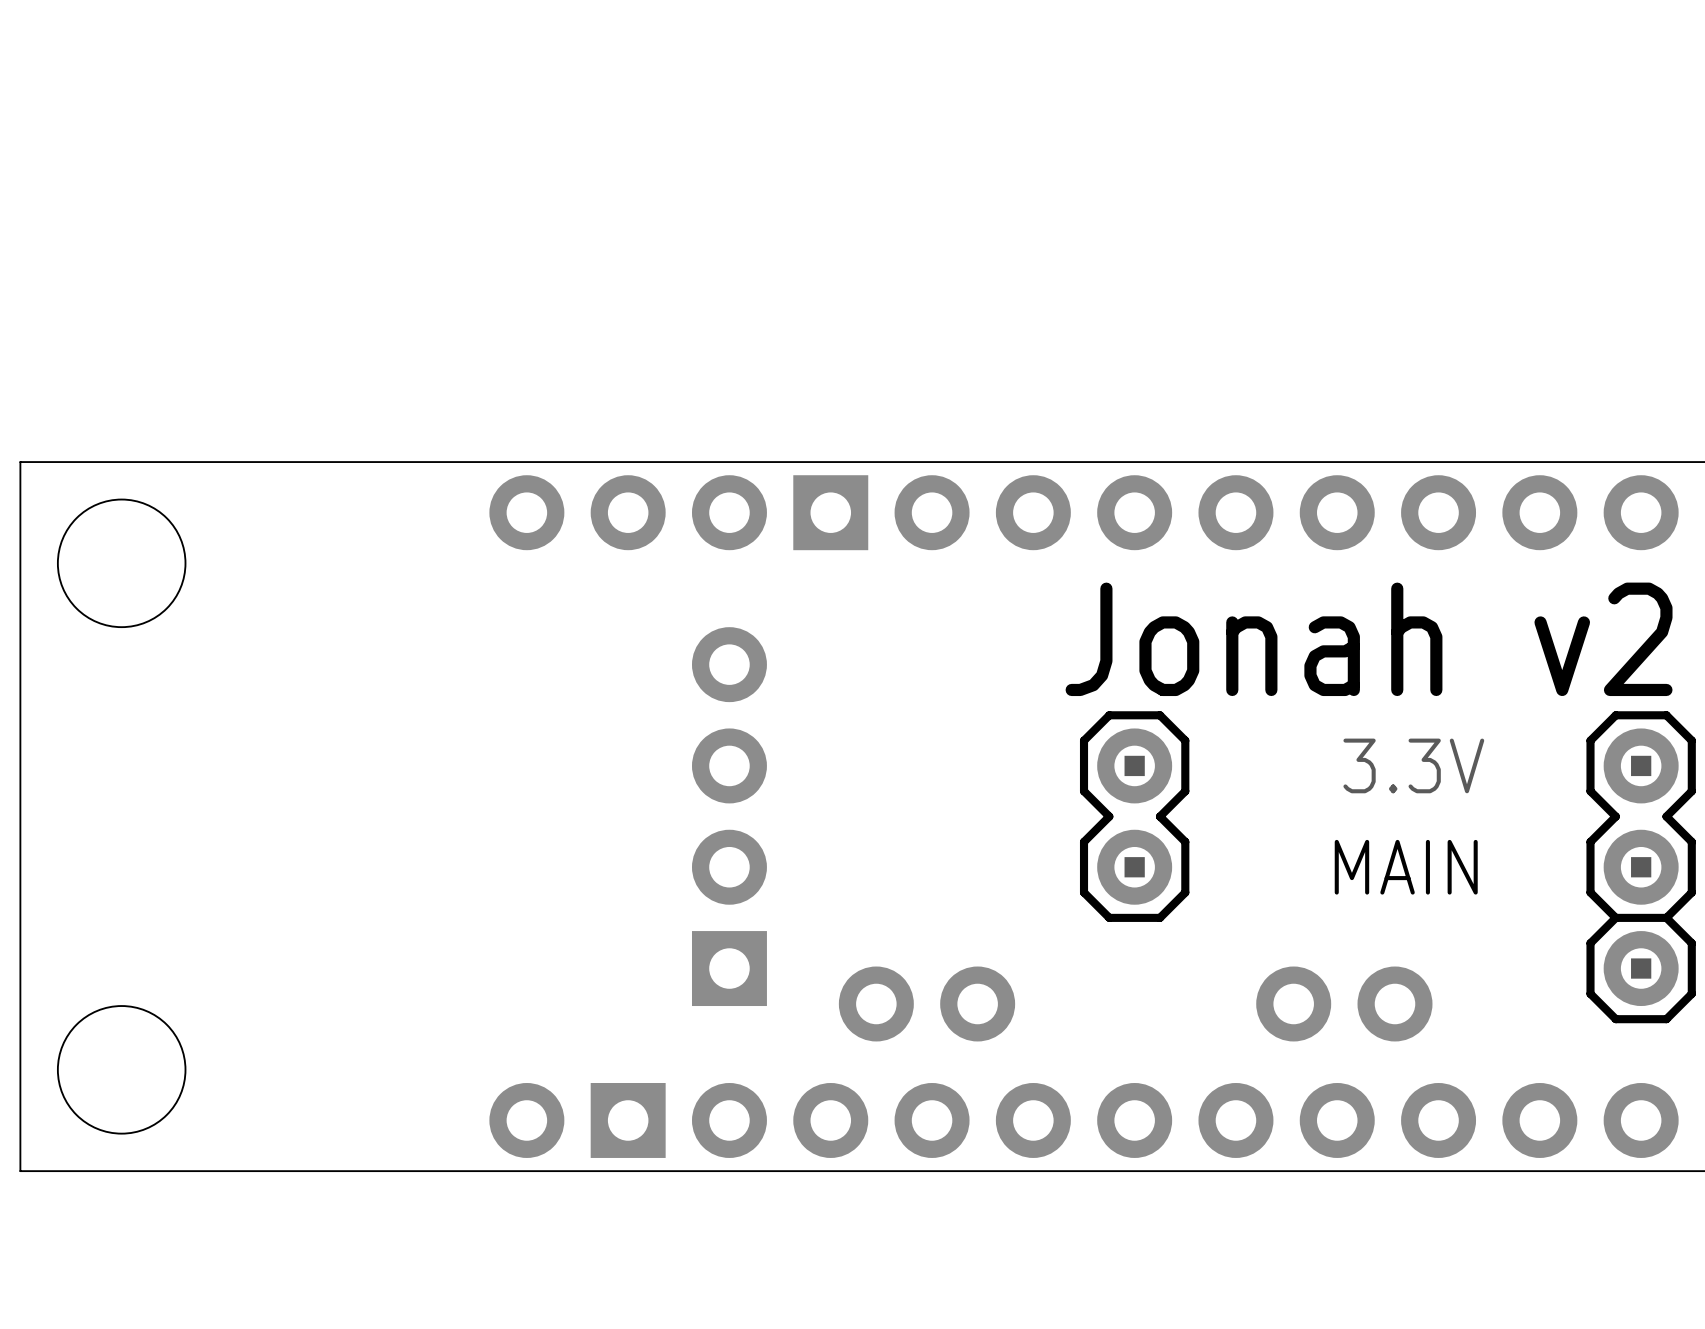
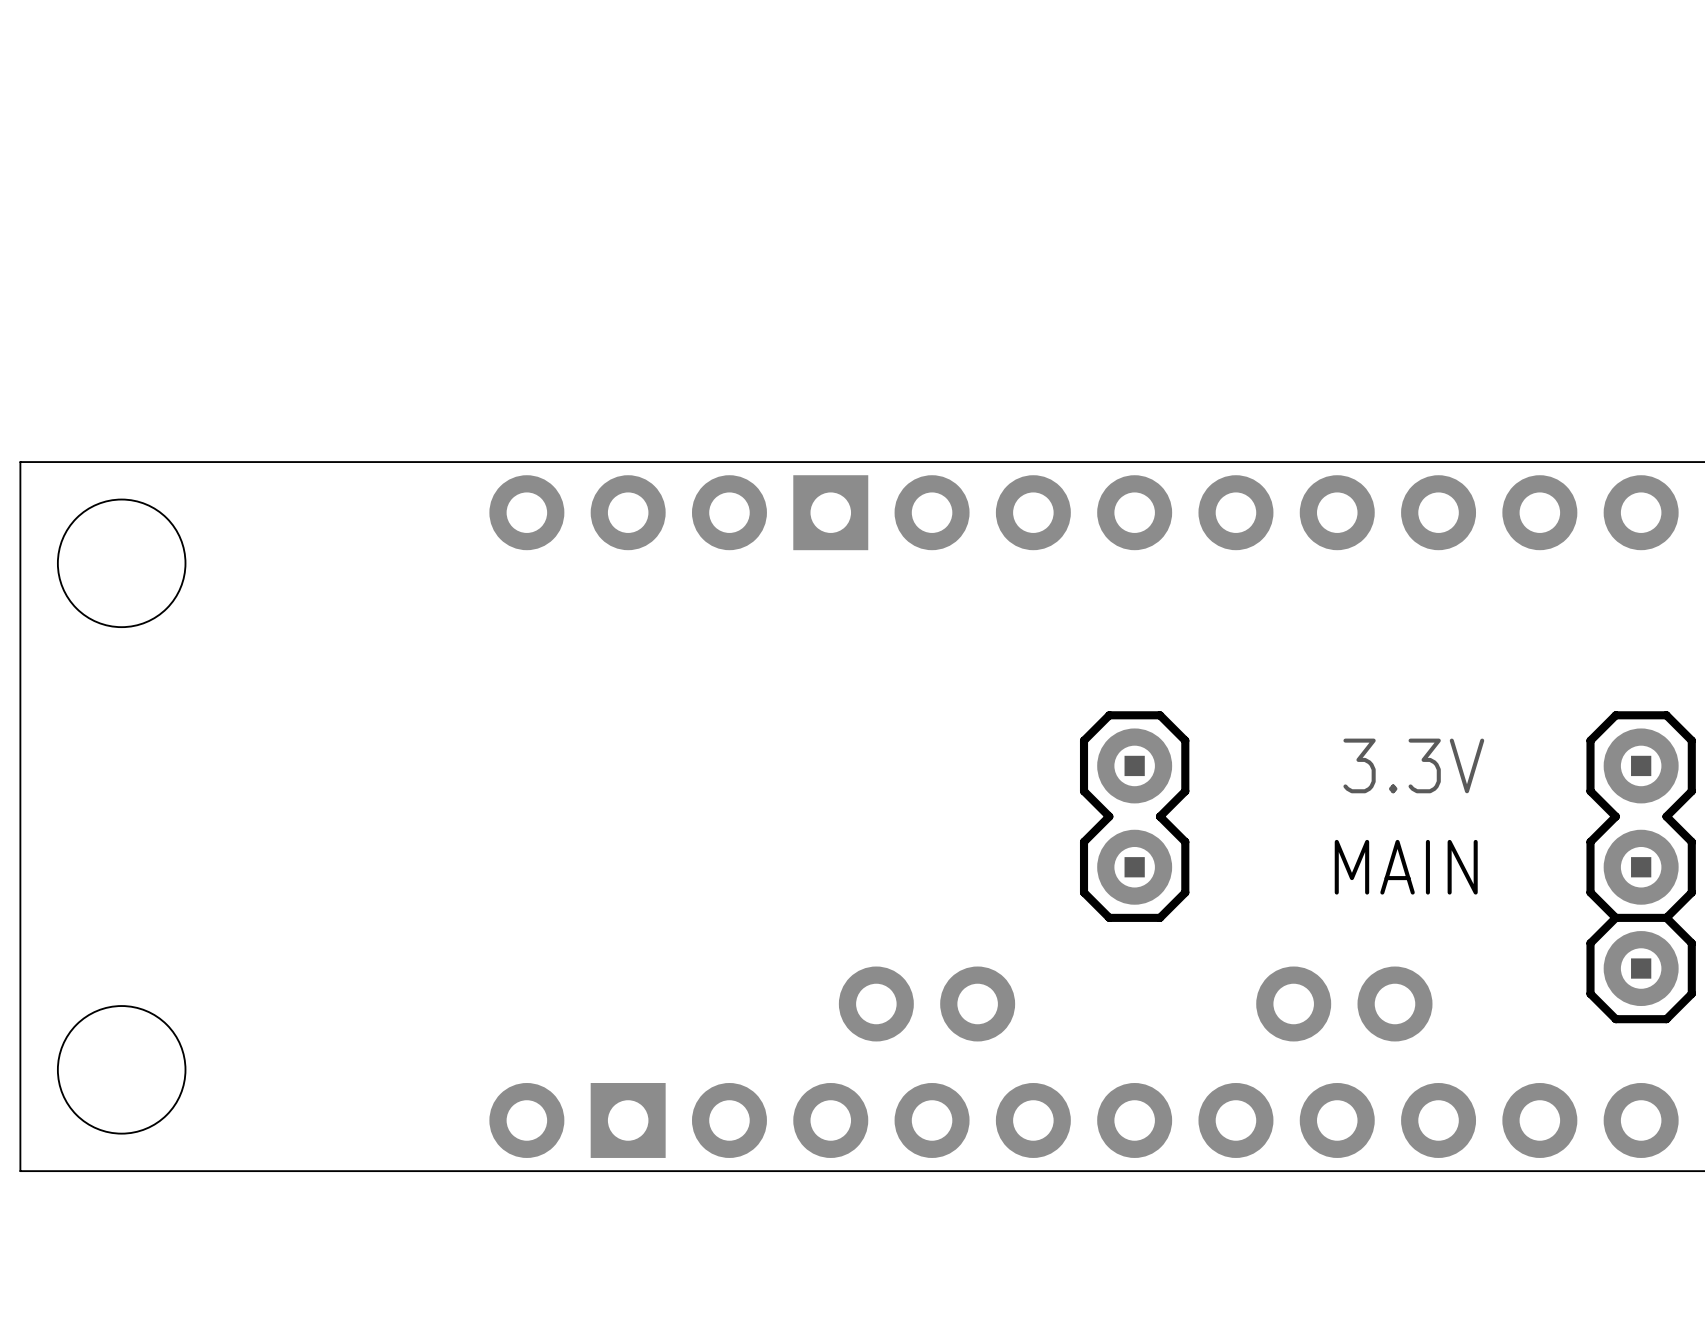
text: Jonah v2 (1369, 639) -> none
part: (729, 816) -> none

